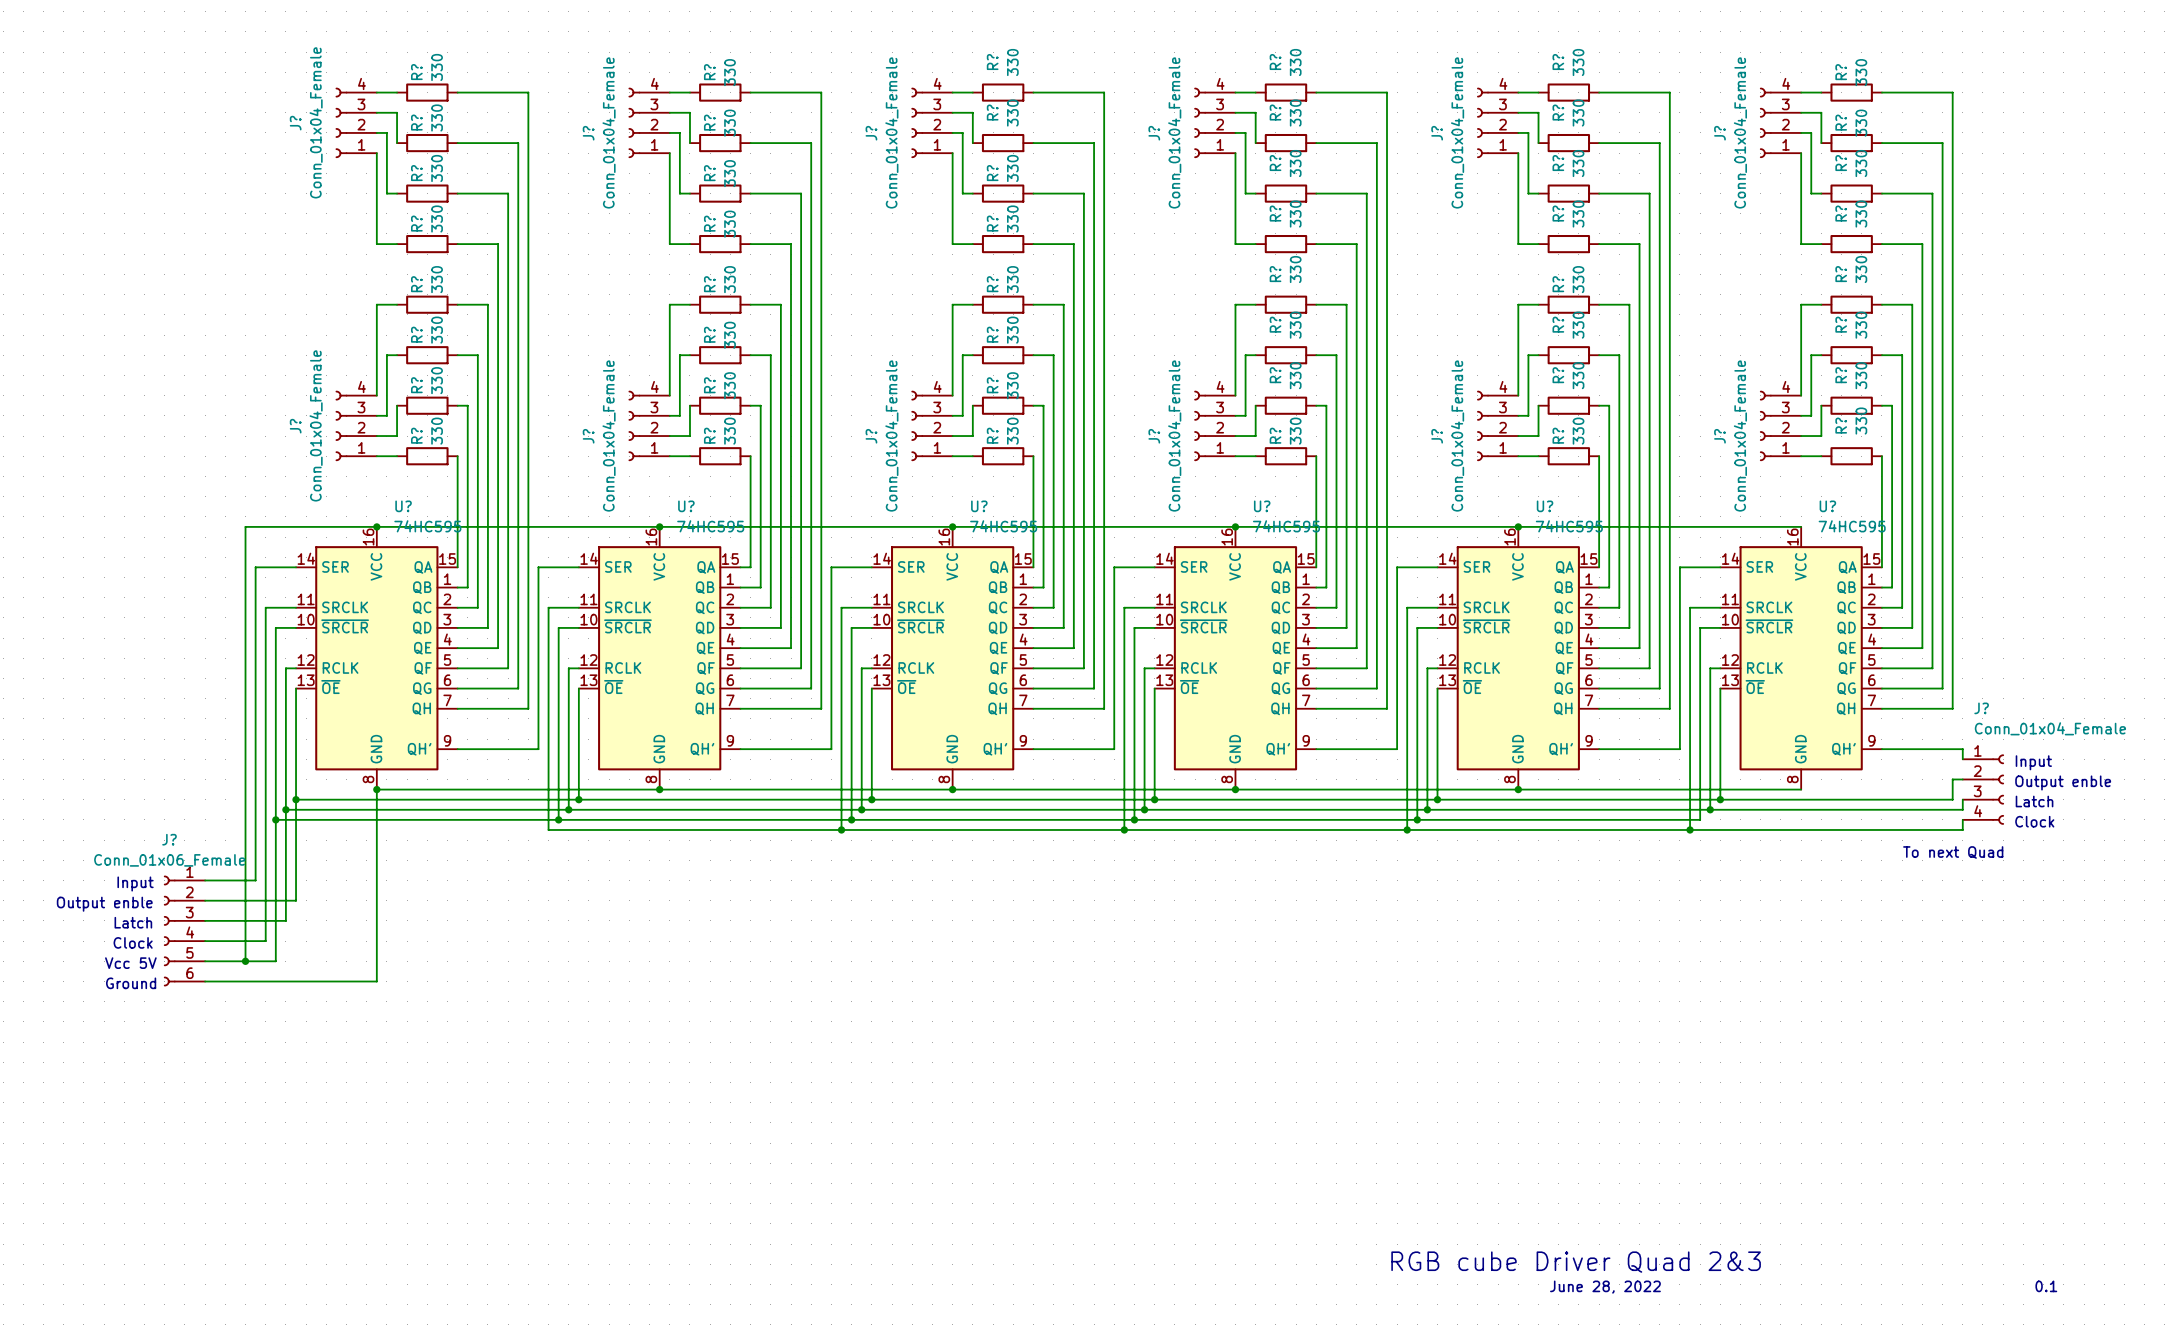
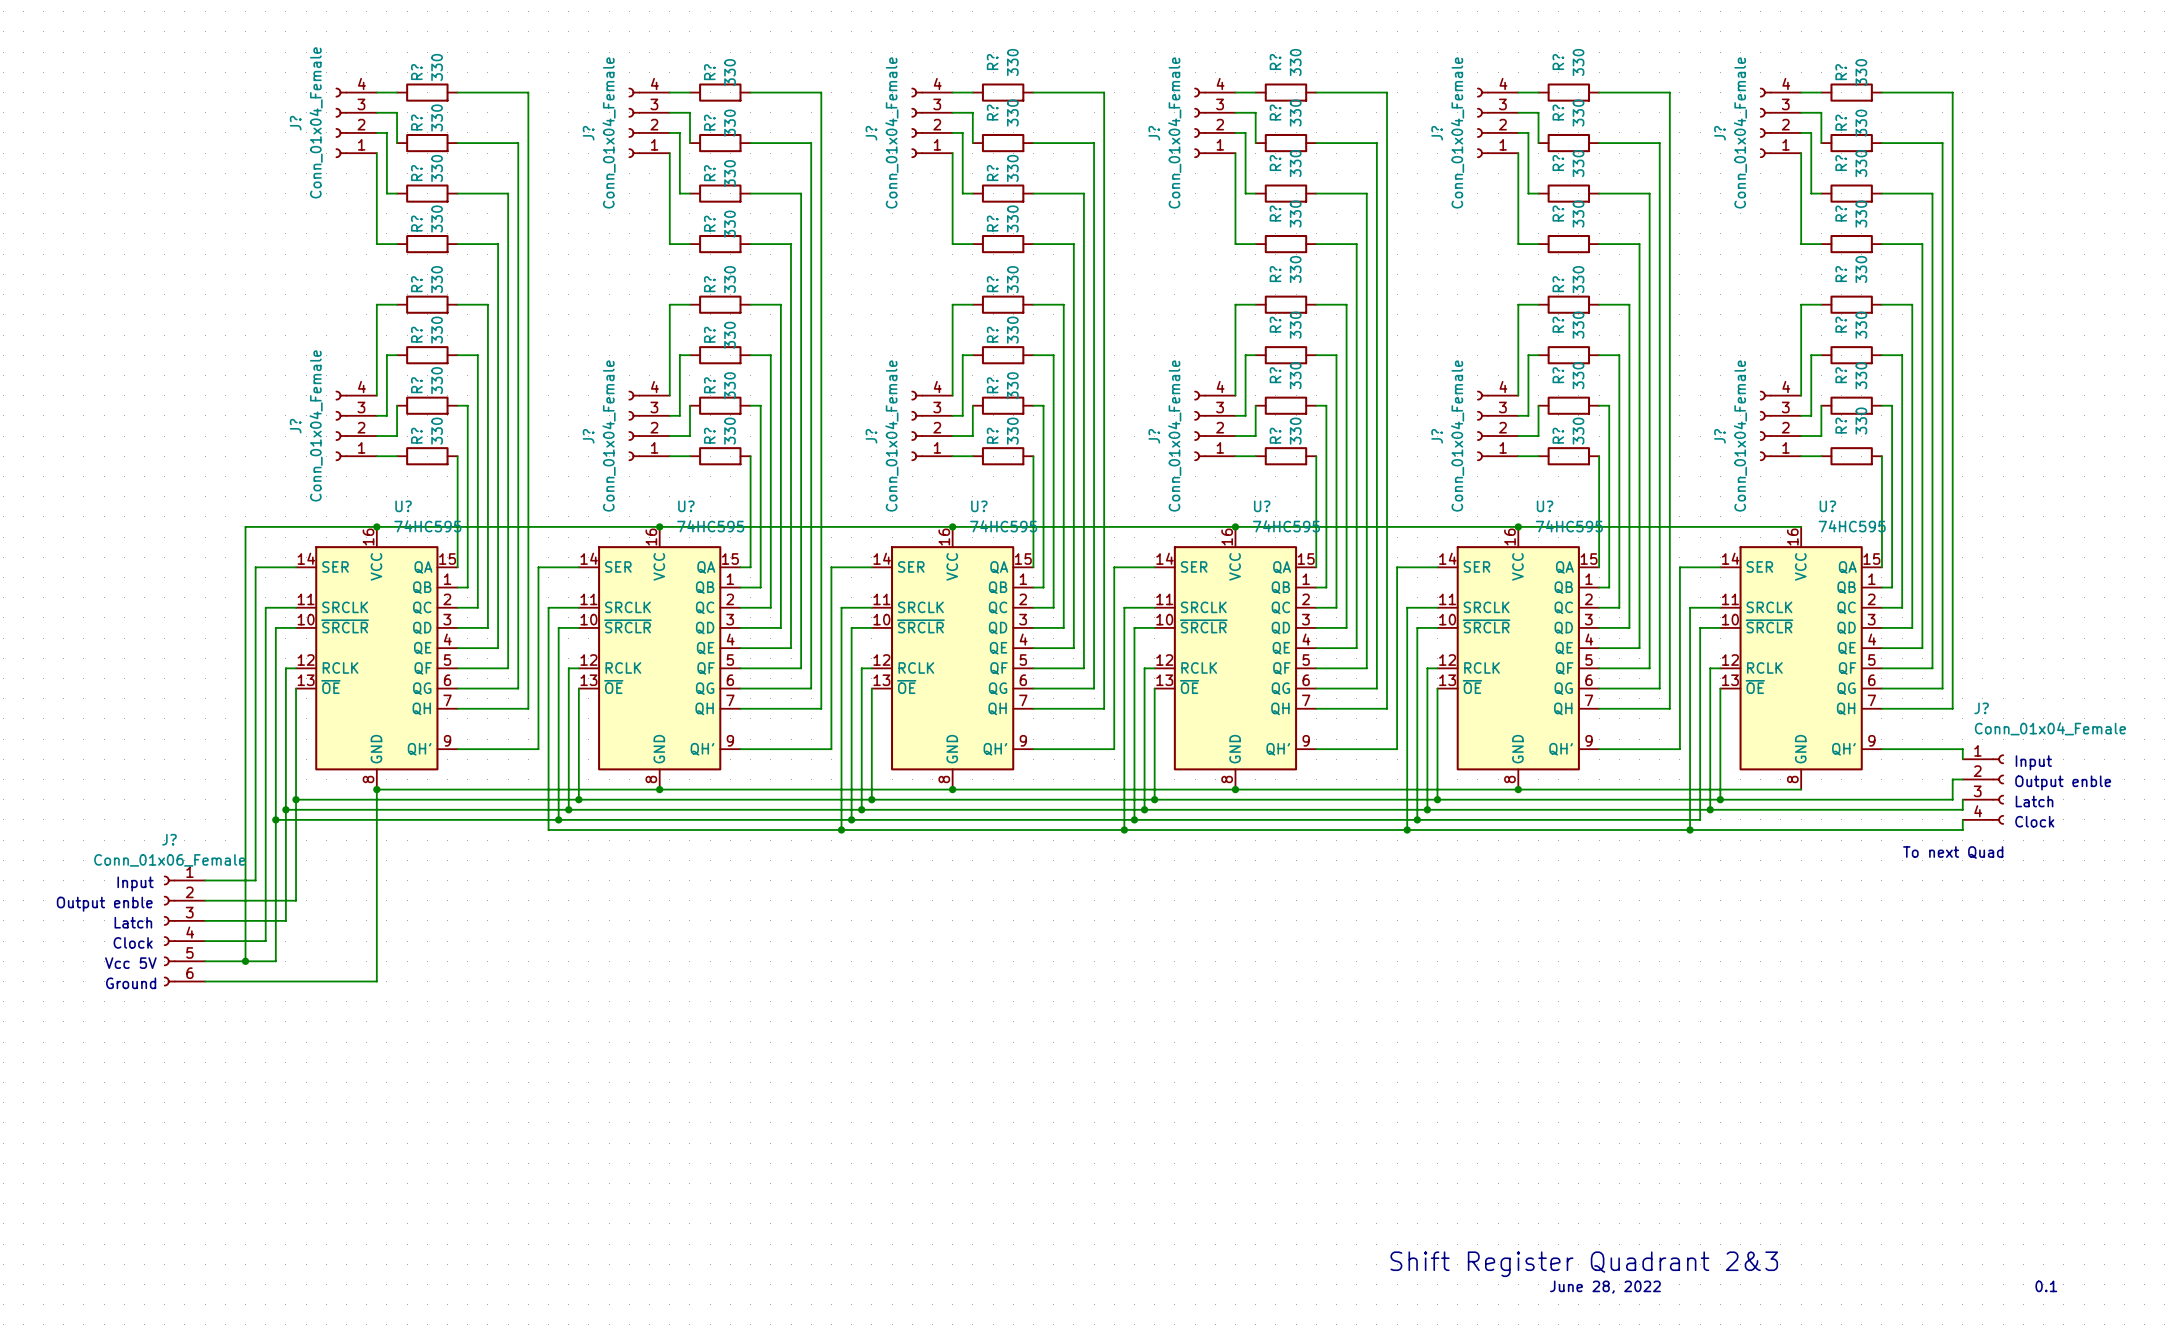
text: RGB cube Driver Quad 2&3 (1576, 1262) -> Shift Register Quadrant 2&3 (1584, 1264)

